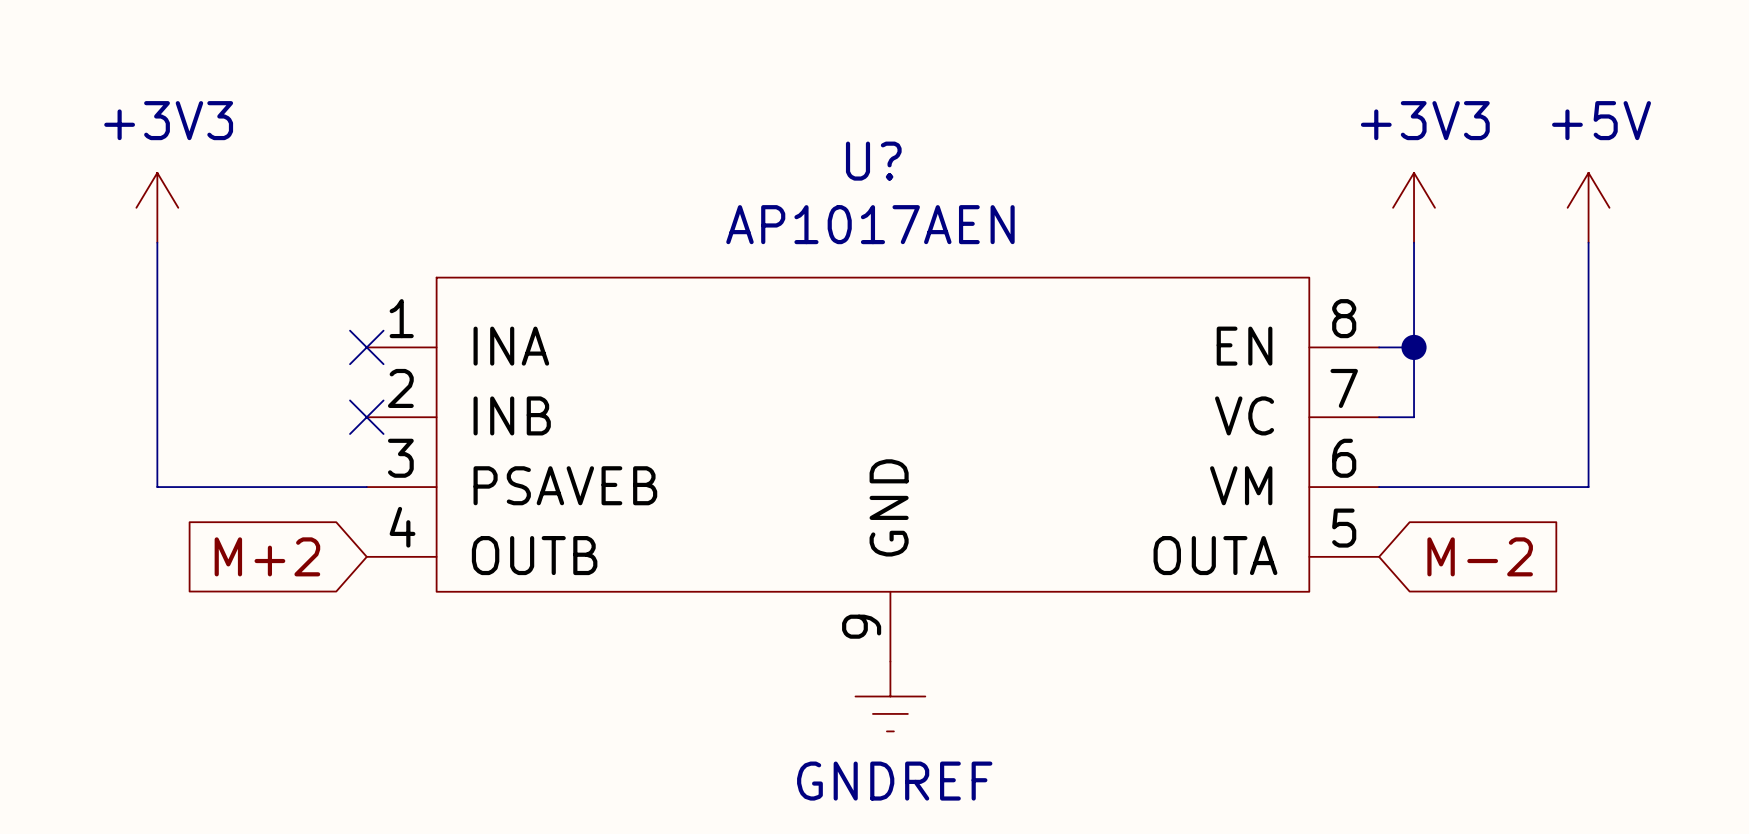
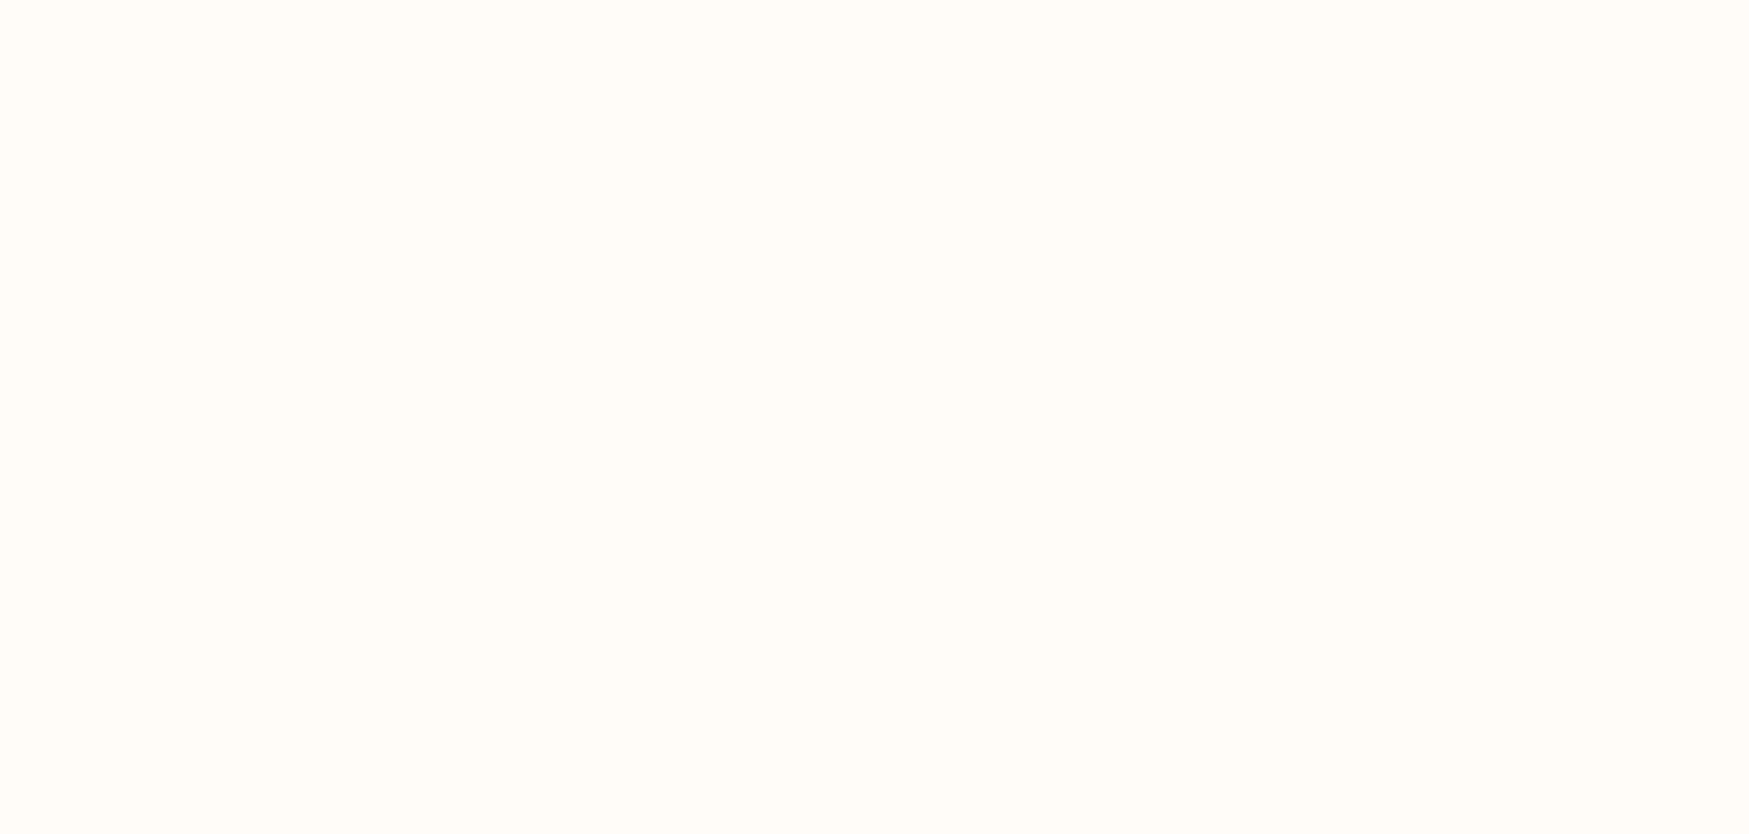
power symbol: +3V3 (157, 207) -> none
power symbol: +3V3 (1414, 207) -> none
power symbol: +5V (1588, 207) -> none
wire: (157, 242) (157, 487) (366, 487) -> none
wire: (1414, 242) (1414, 417) (1379, 417) -> none
wire: (1588, 242) (1588, 487) (1379, 487) -> none
no-connect mark: (366, 347) -> none
wire: (1379, 347) (1414, 347) -> none
junction: (1414, 347) -> none
no-connect mark: (366, 417) -> none
U?: AP1017AEN (872, 469) -> none
global label: M+2 (267, 556) -> none
global label: M-2 (1480, 556) -> none
power symbol: GNDREF (890, 696) -> none

